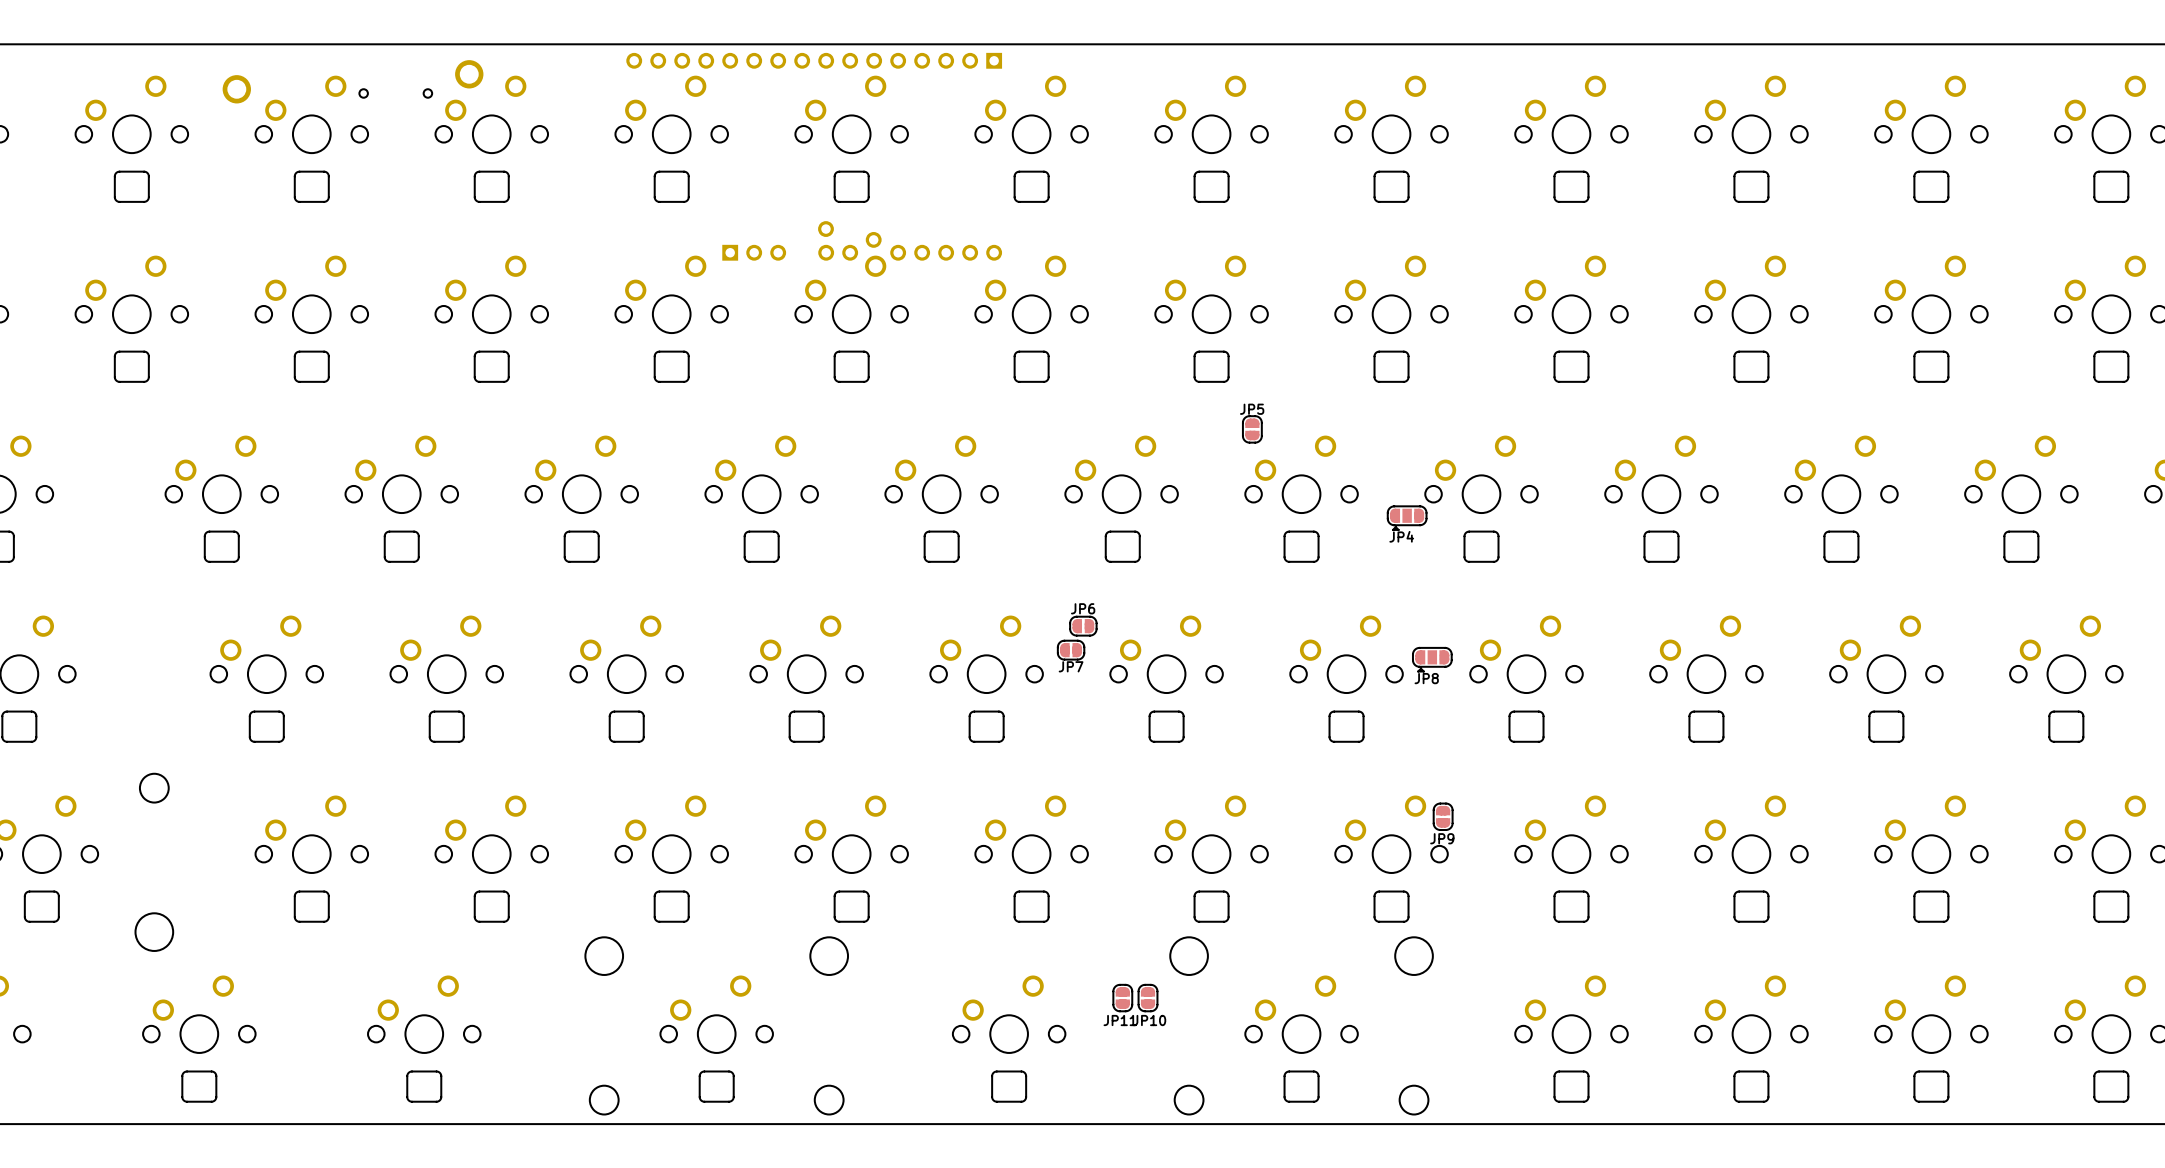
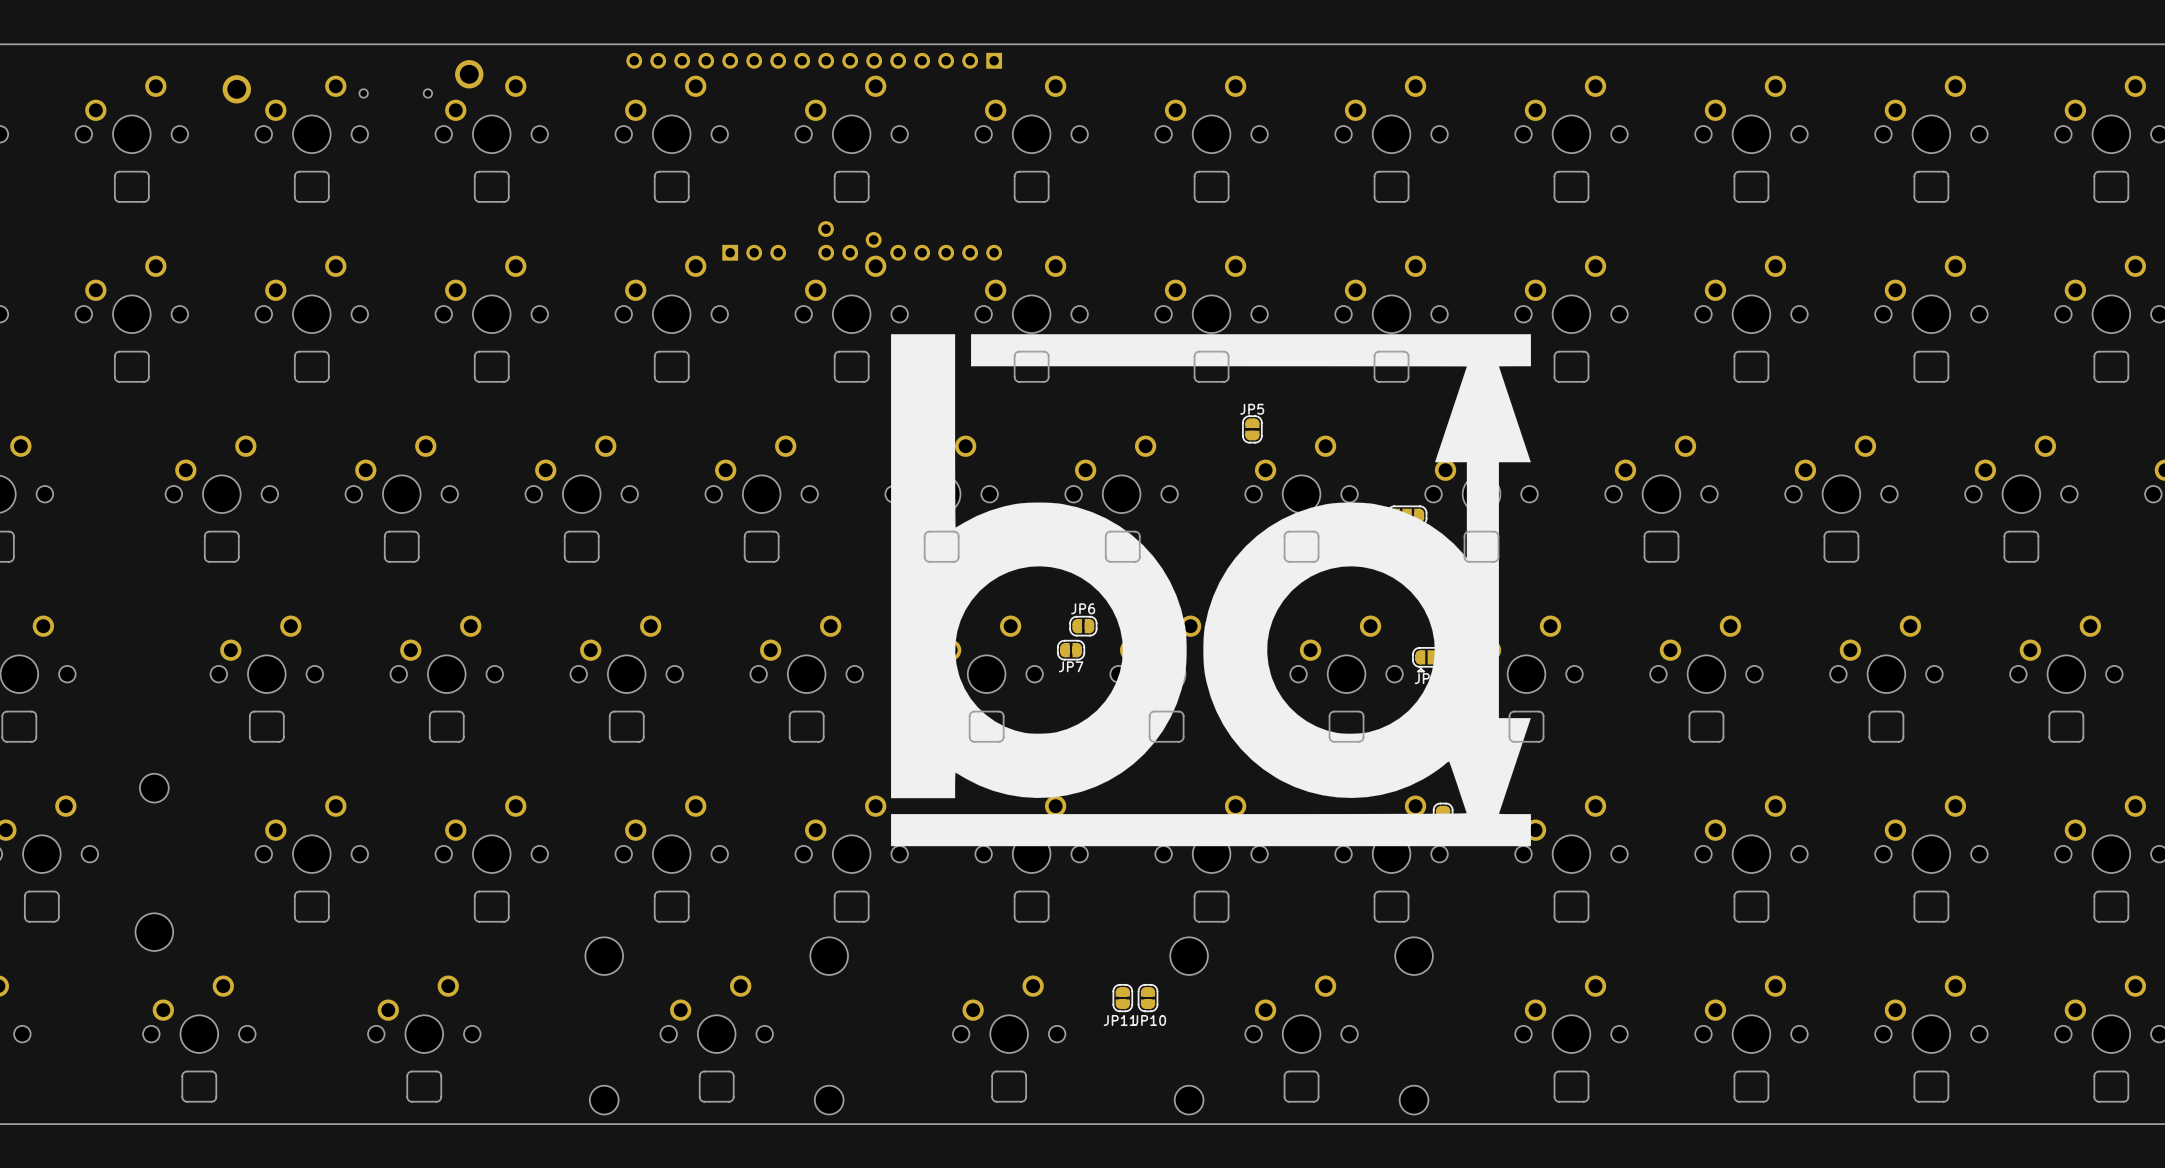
drawing: none -> [891, 334, 1531, 847]

